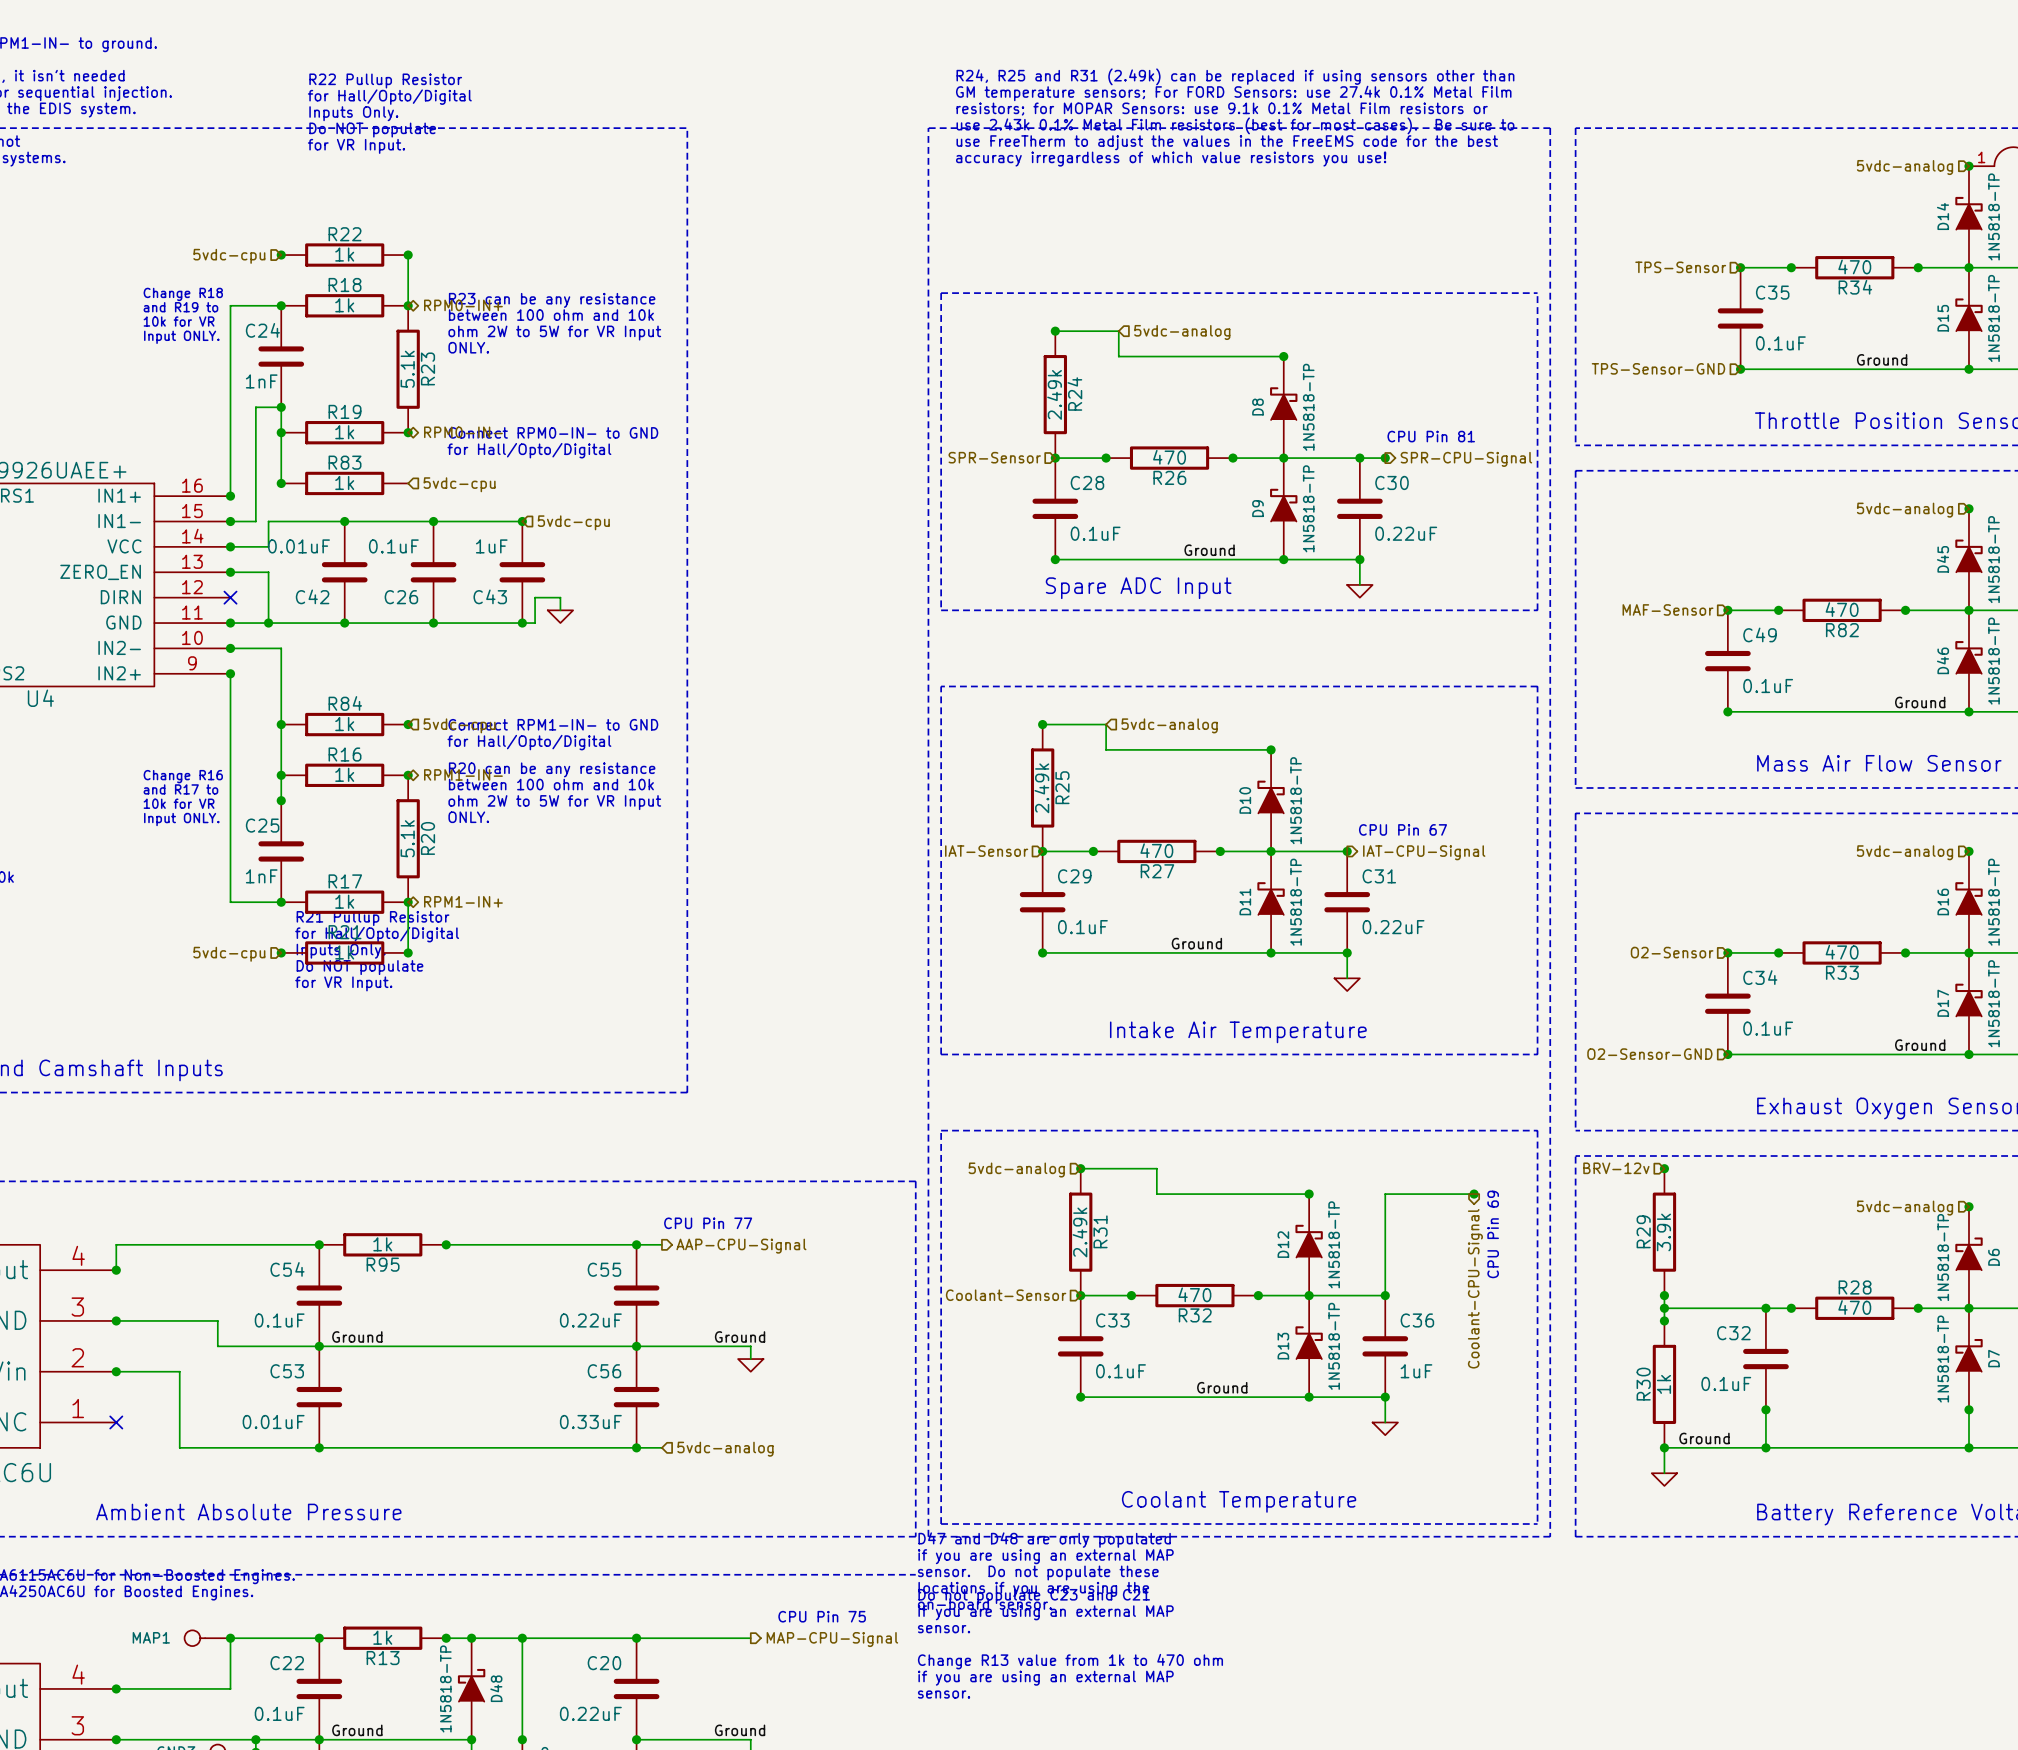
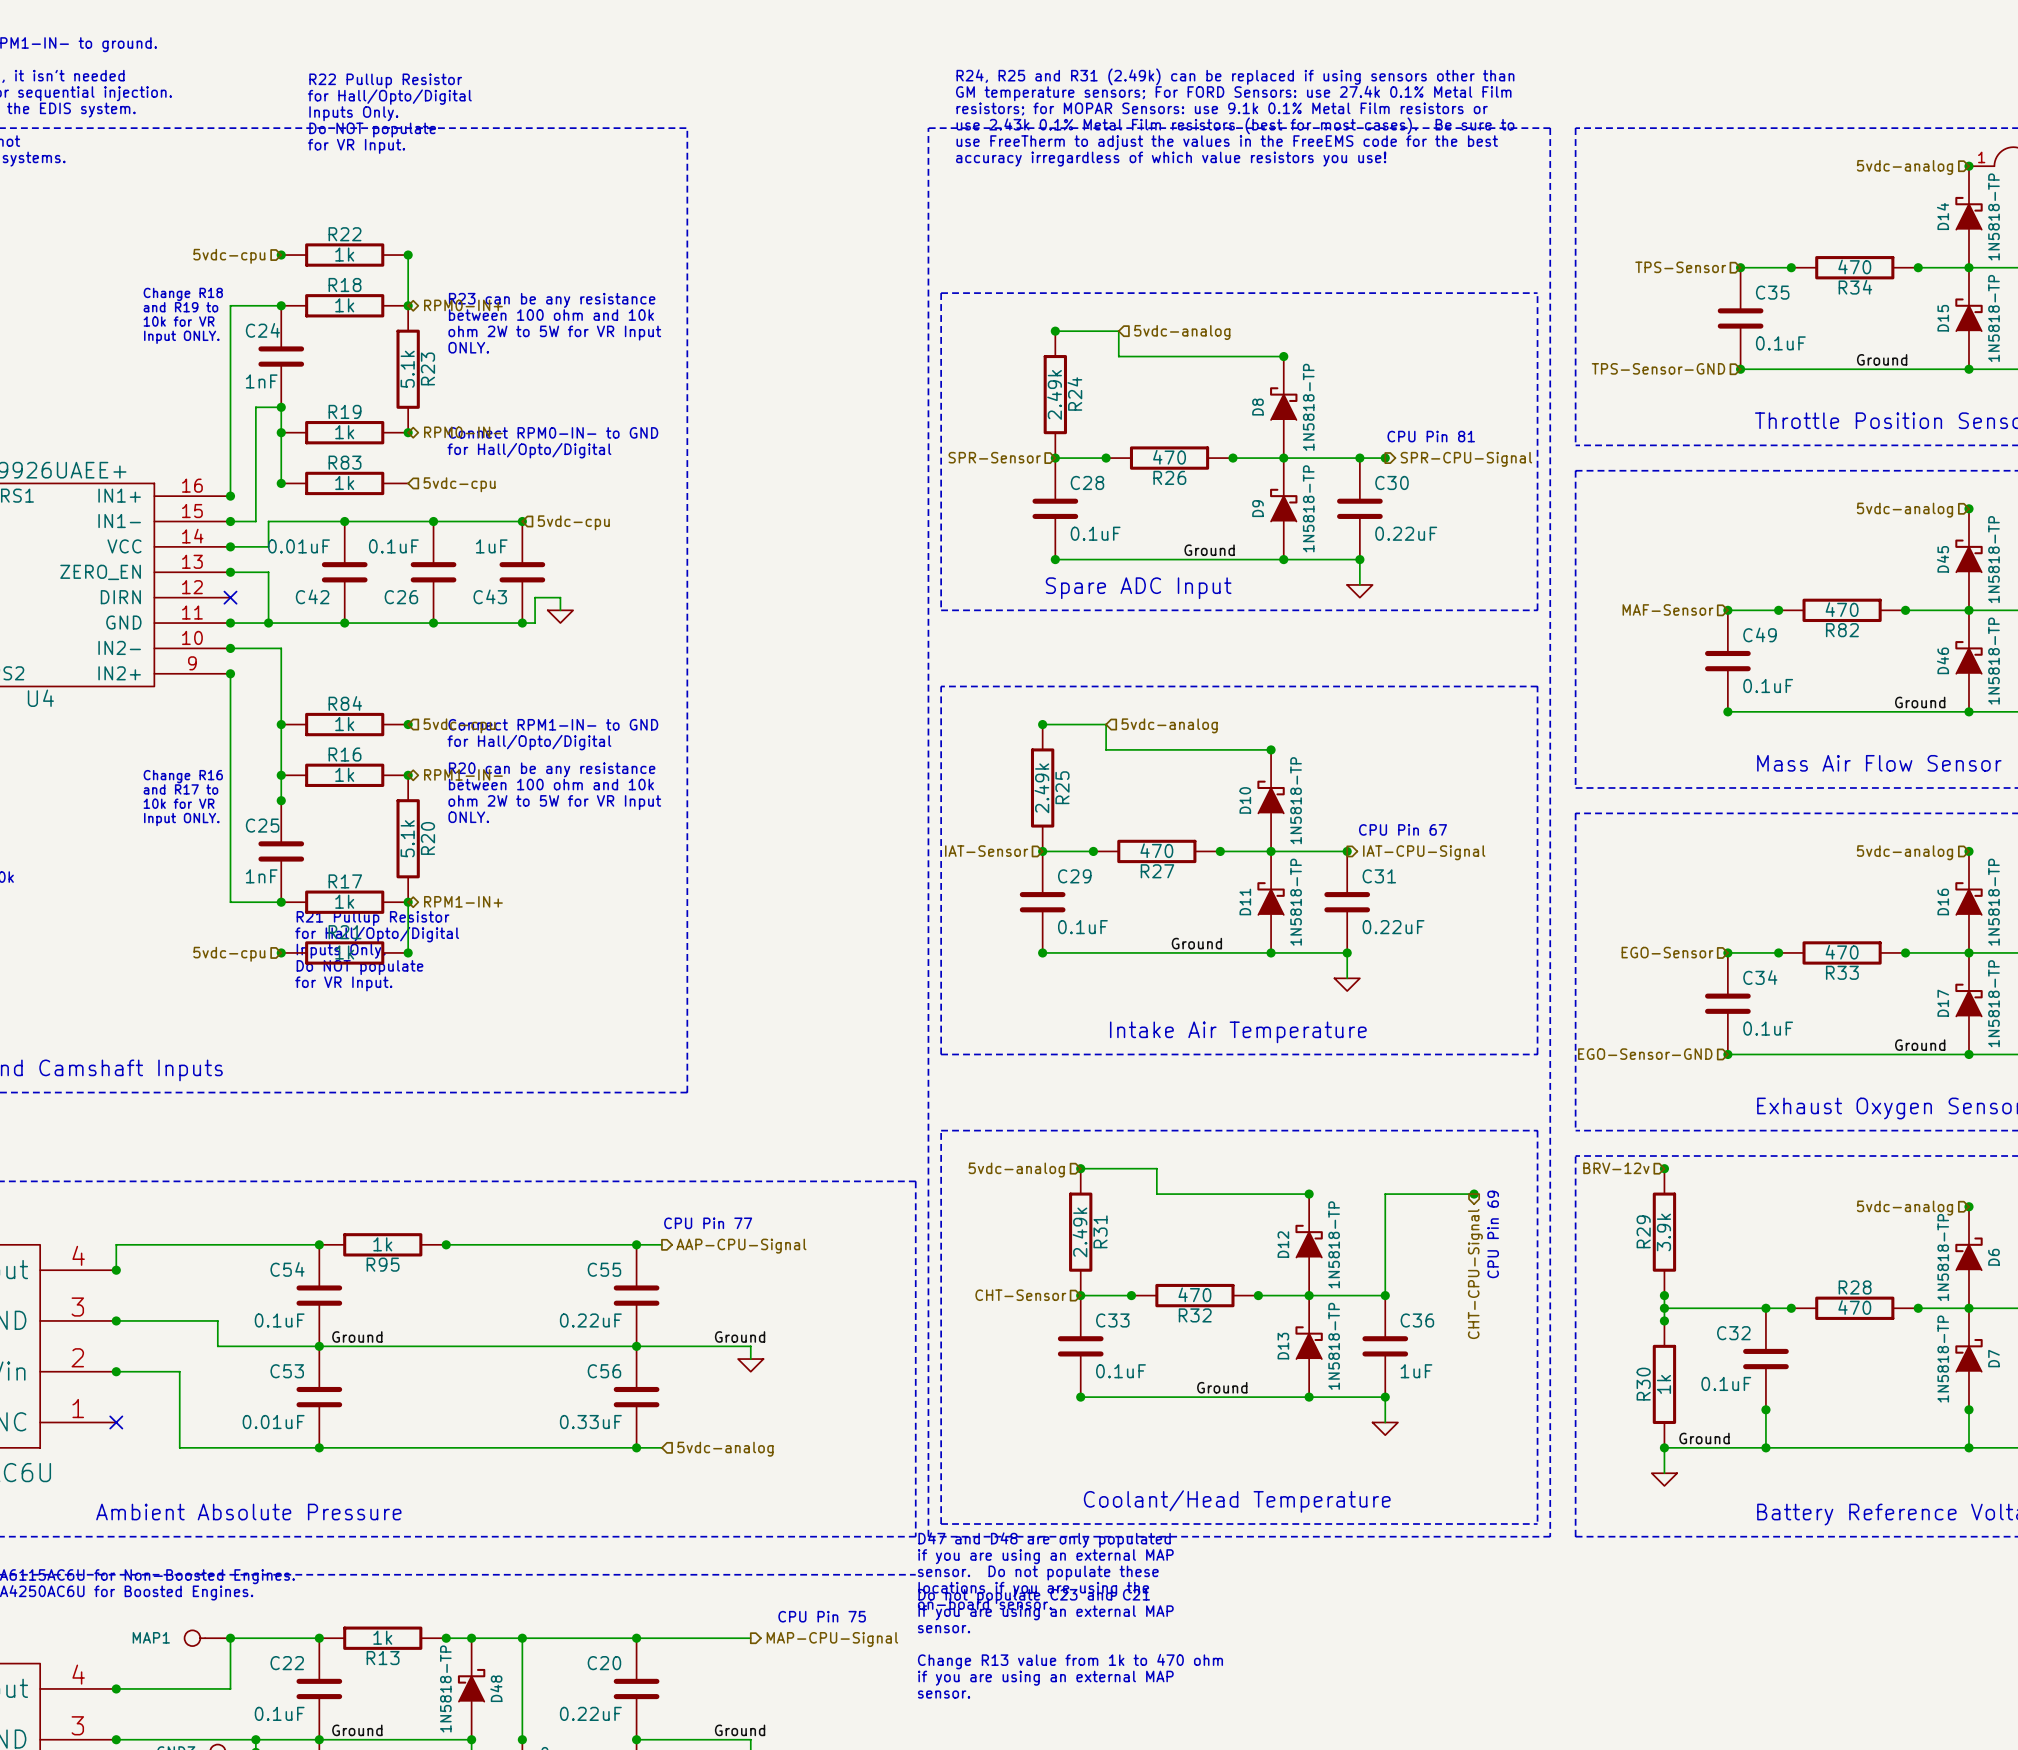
hierarchical label: O2-Sensor (1672, 952) -> EGO-Sensor (1667, 952)
hierarchical label: O2-Sensor-GND (1649, 1054) -> EGO-Sensor-GND (1645, 1054)
hierarchical label: Coolant-CPU-Signal (1475, 1288) -> CHT-CPU-Signal (1475, 1274)
hierarchical label: Coolant-Sensor (1006, 1295) -> CHT-Sensor (1020, 1295)
text: Coolant Temperature (1239, 1501) -> Coolant/Head Temperature (1237, 1501)

